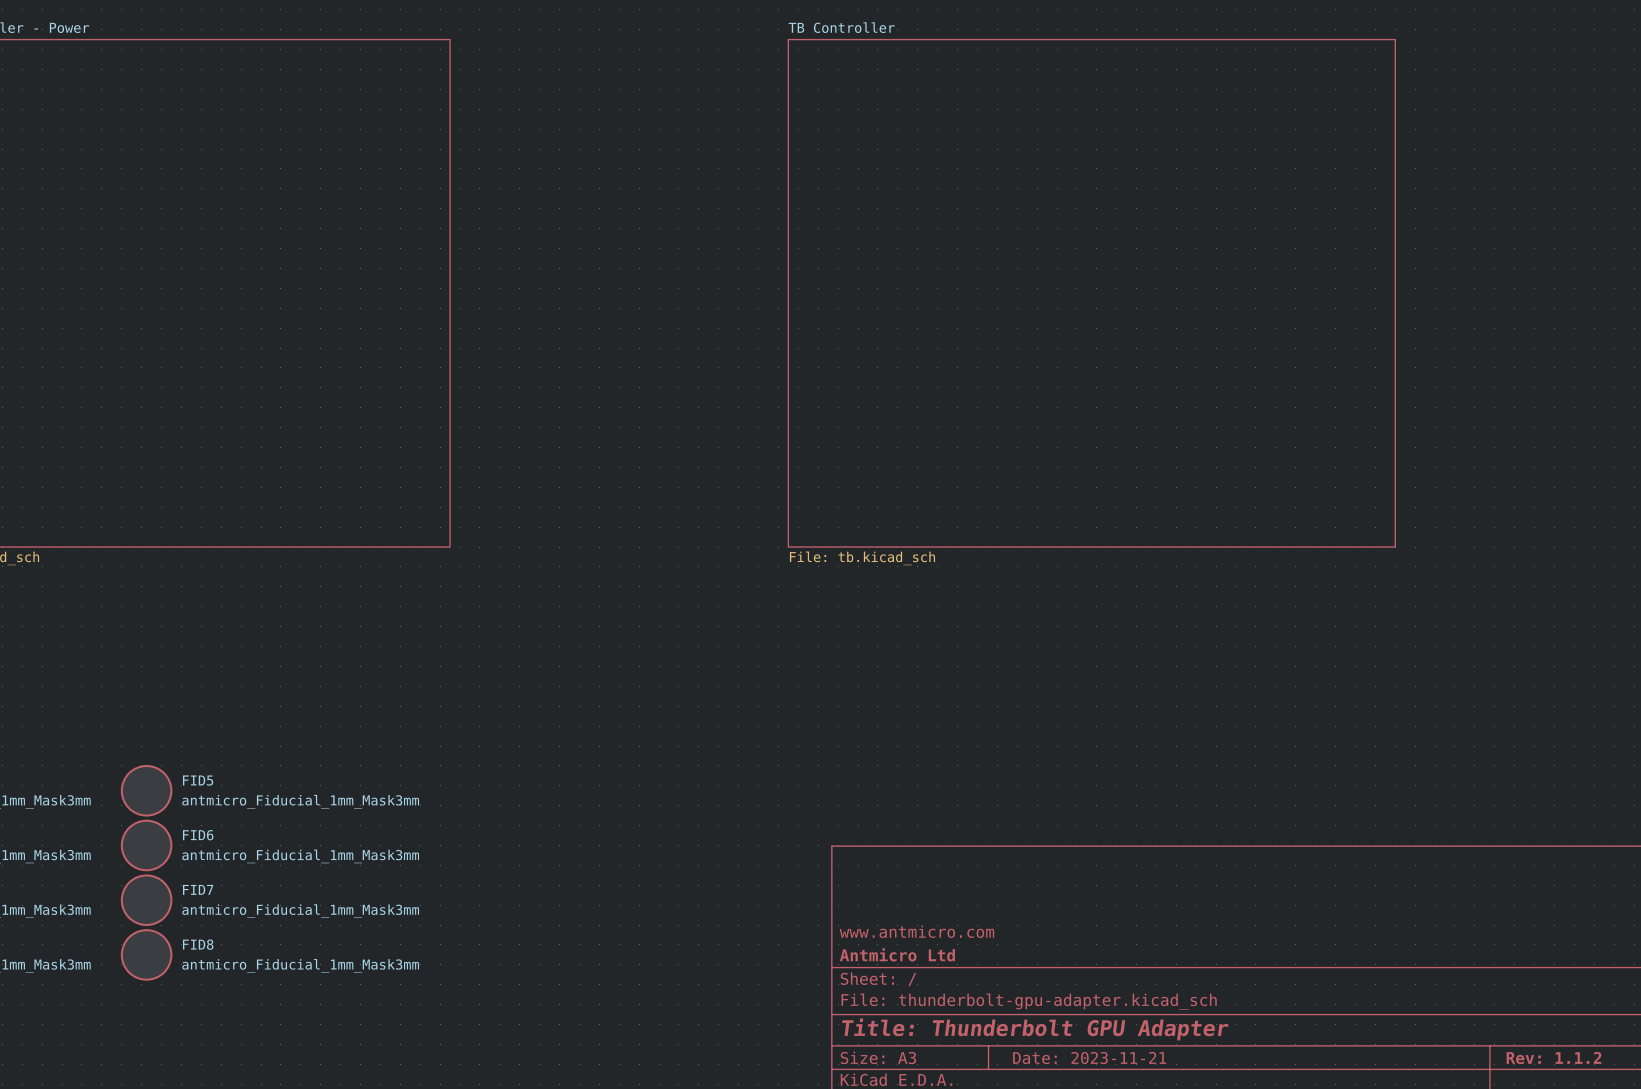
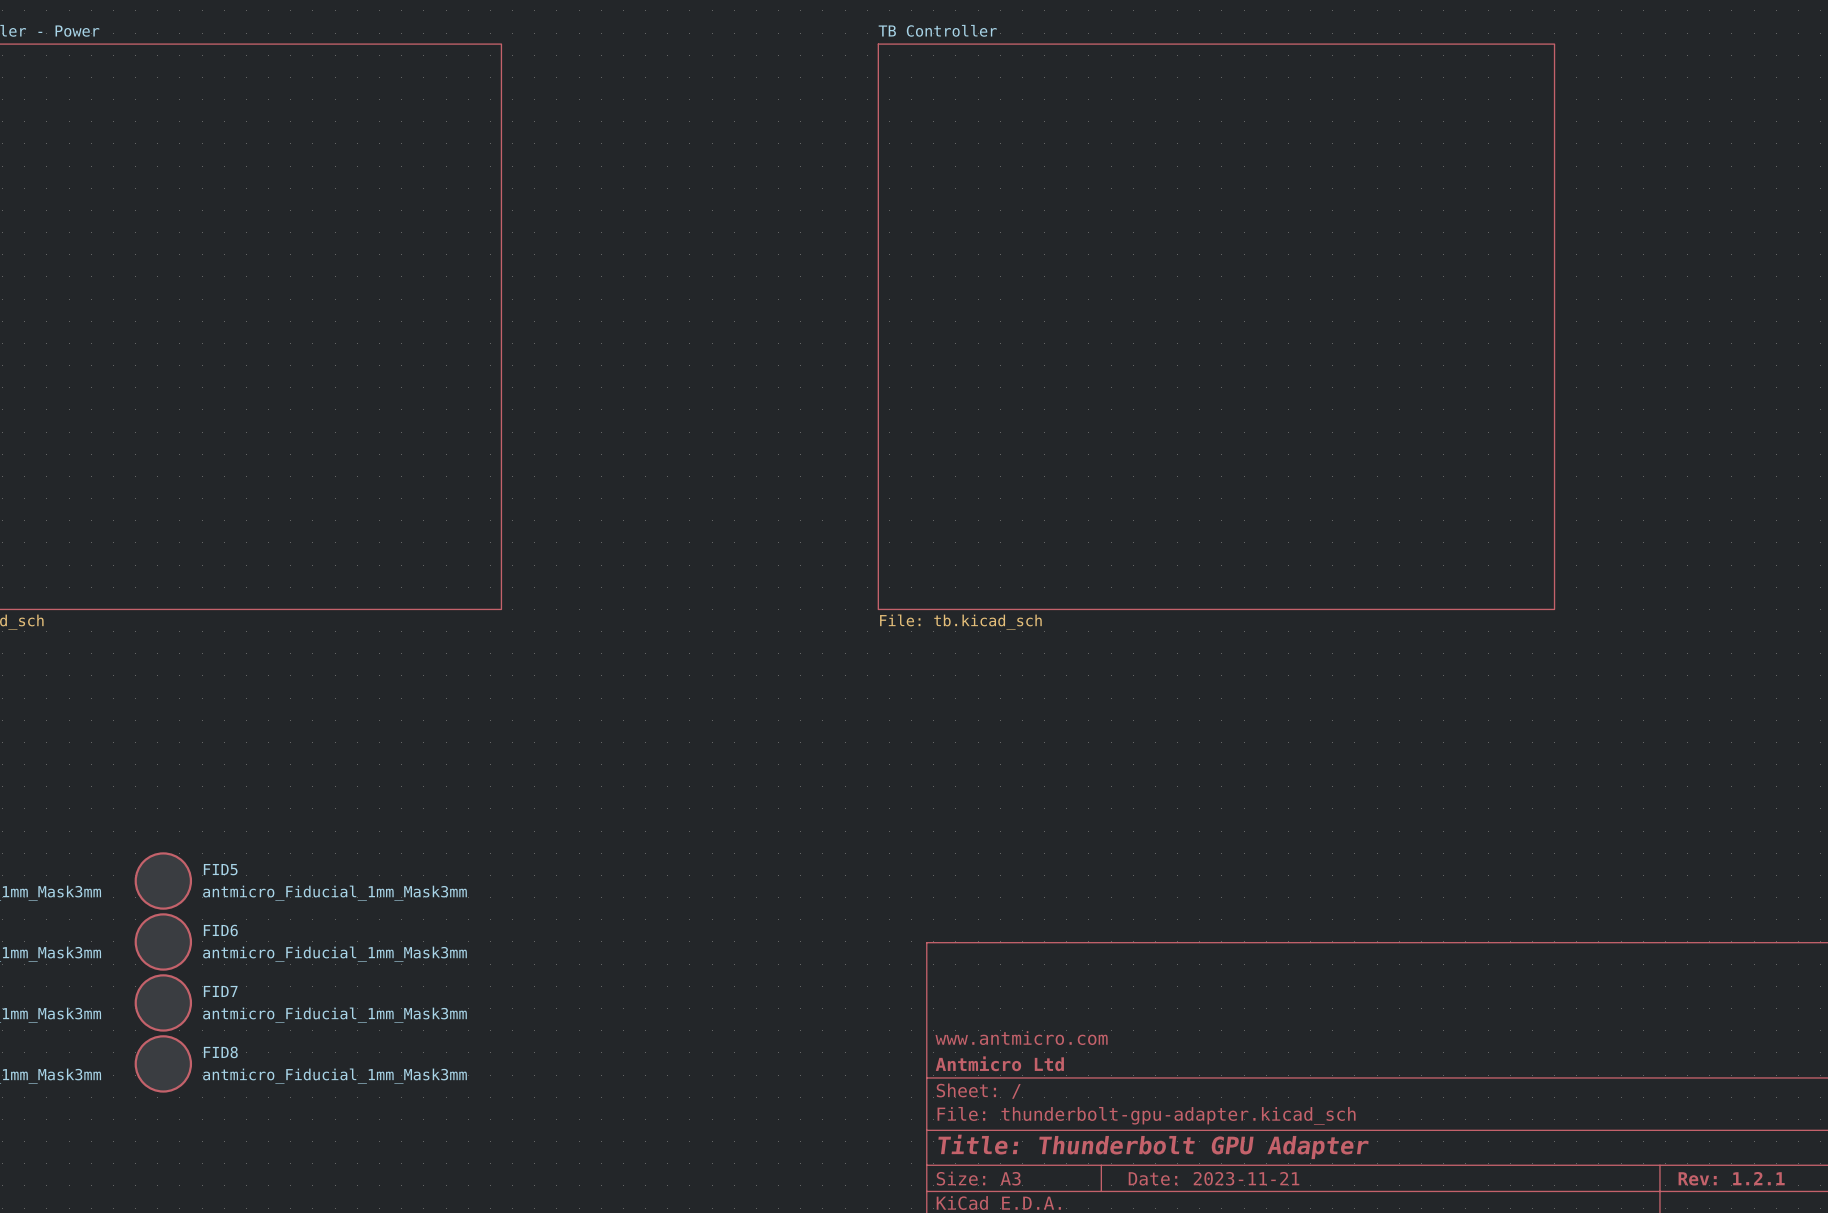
title block: Rev: 1.1.2 (1553, 1058) -> Rev: 1.2.1 (1731, 1178)

